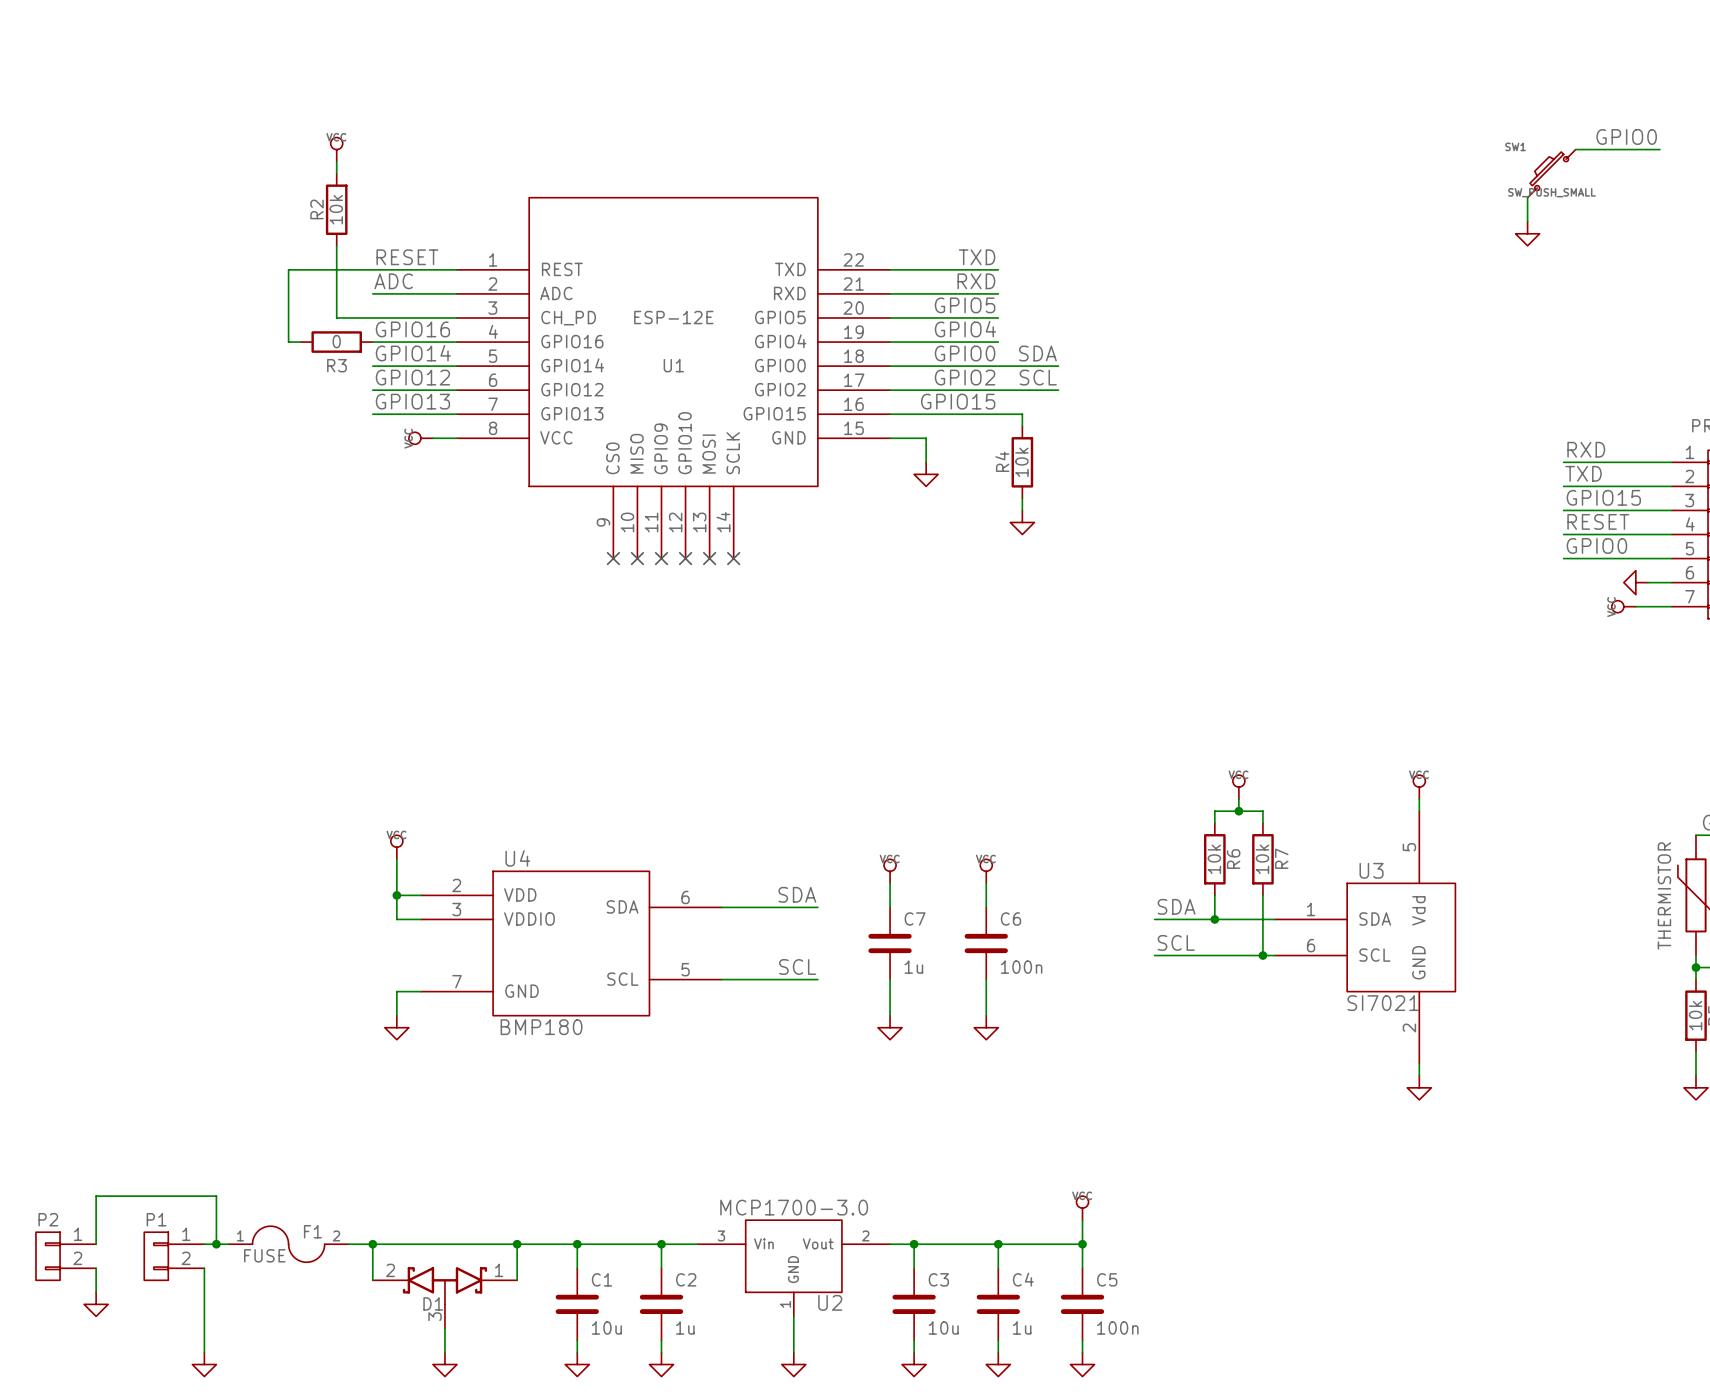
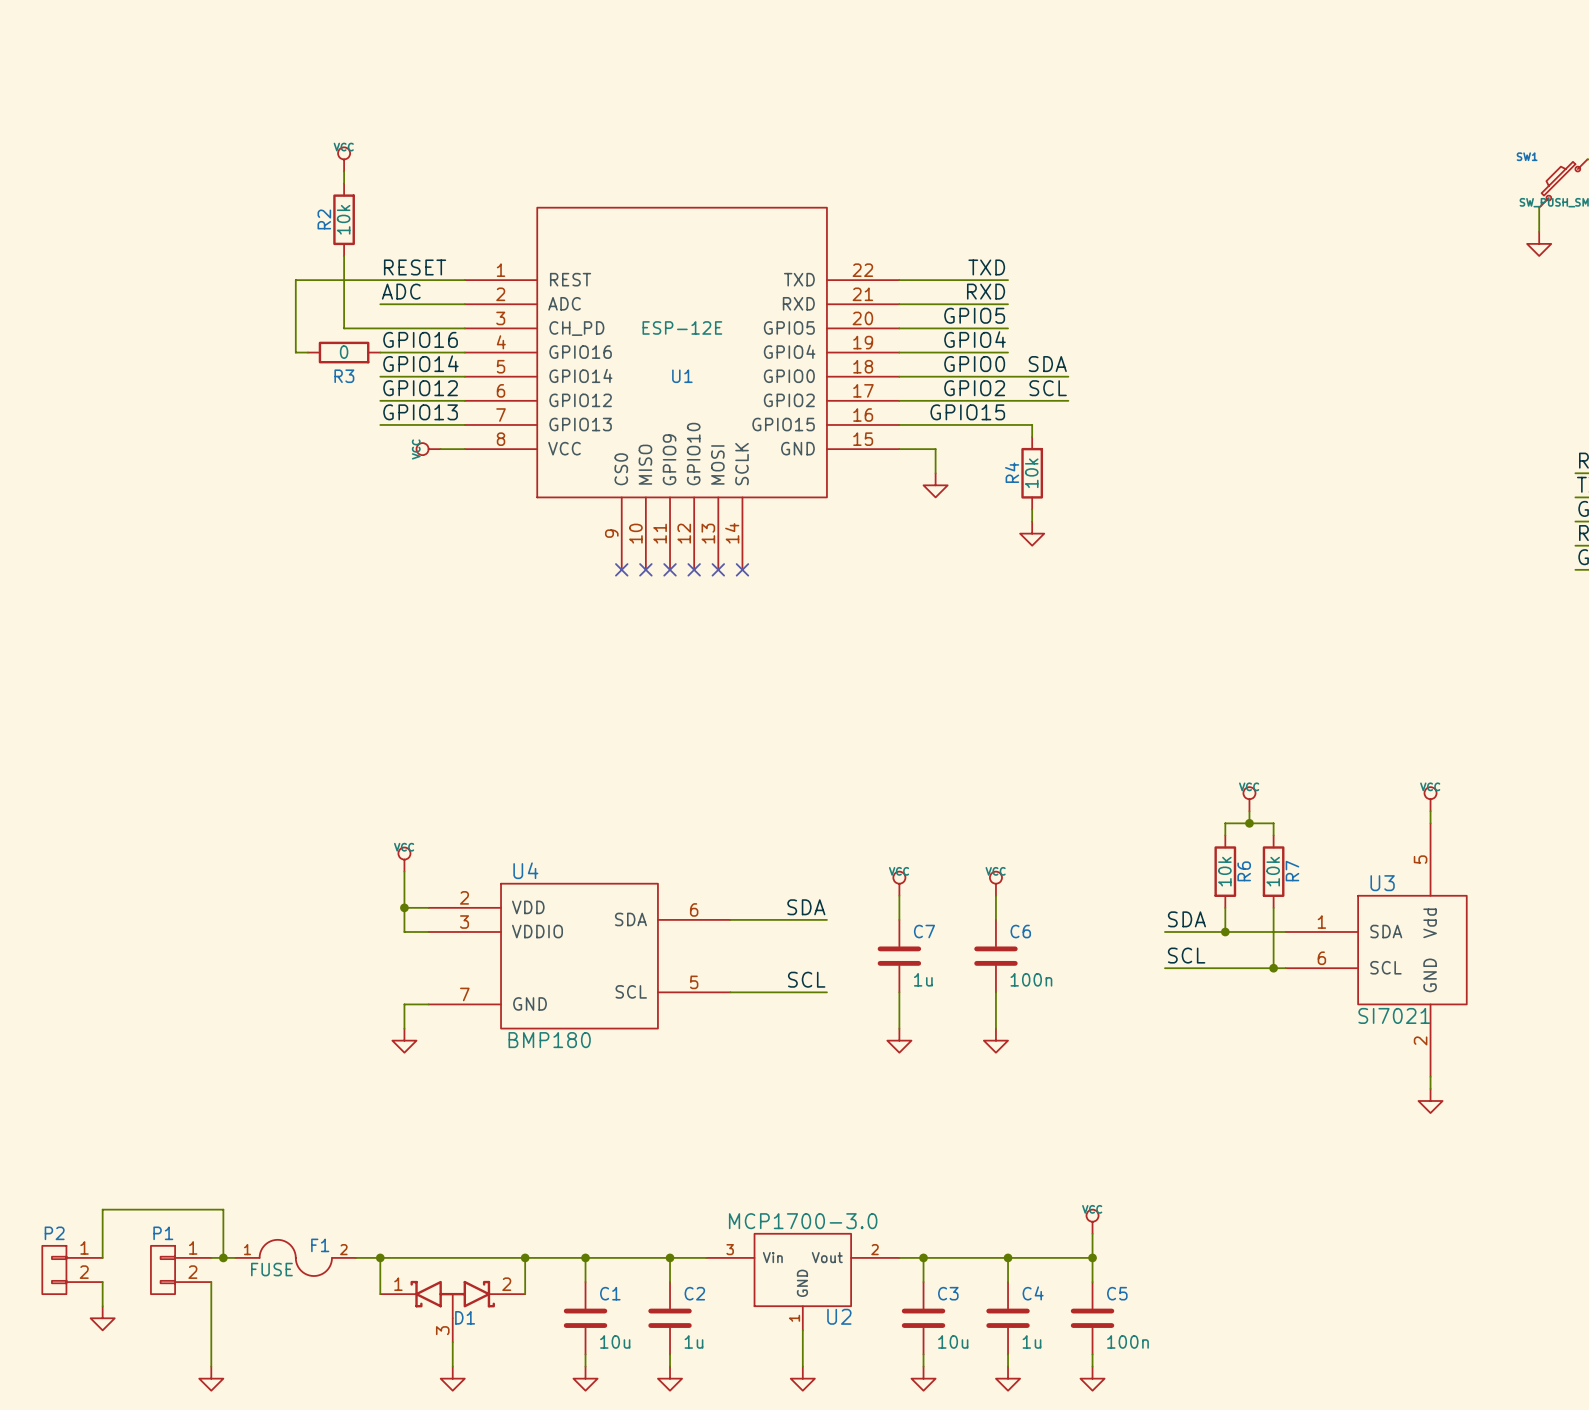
D1 flip: as is (444, 1285) -> left-right (452, 1299)

